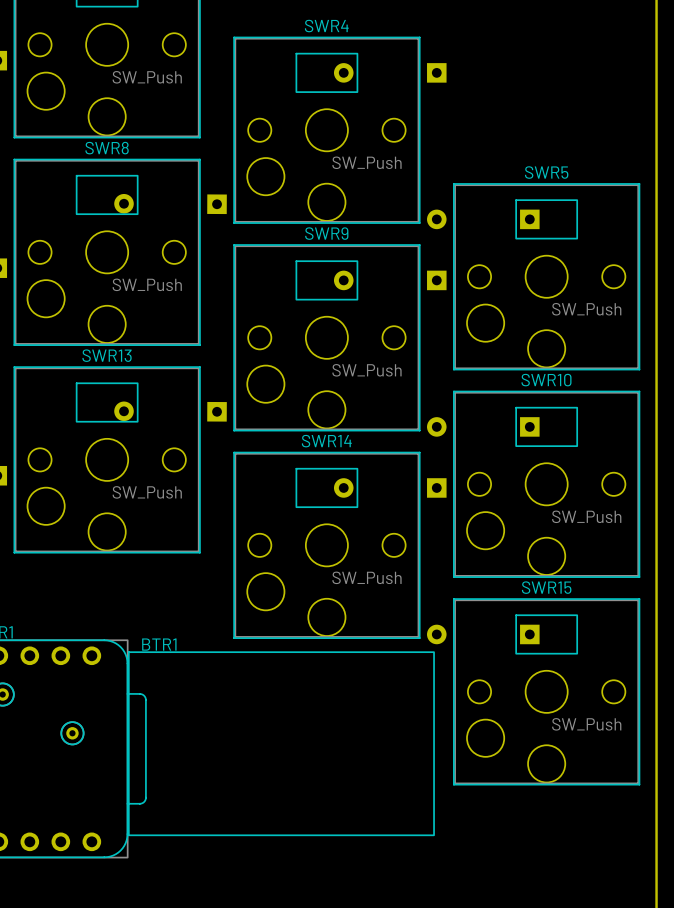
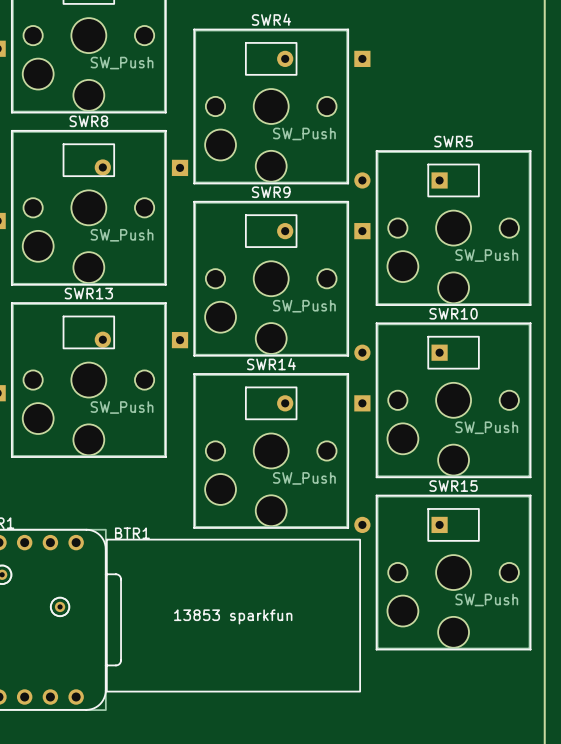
BTR1 value: none -> 13853 sparkfun (233, 616)

